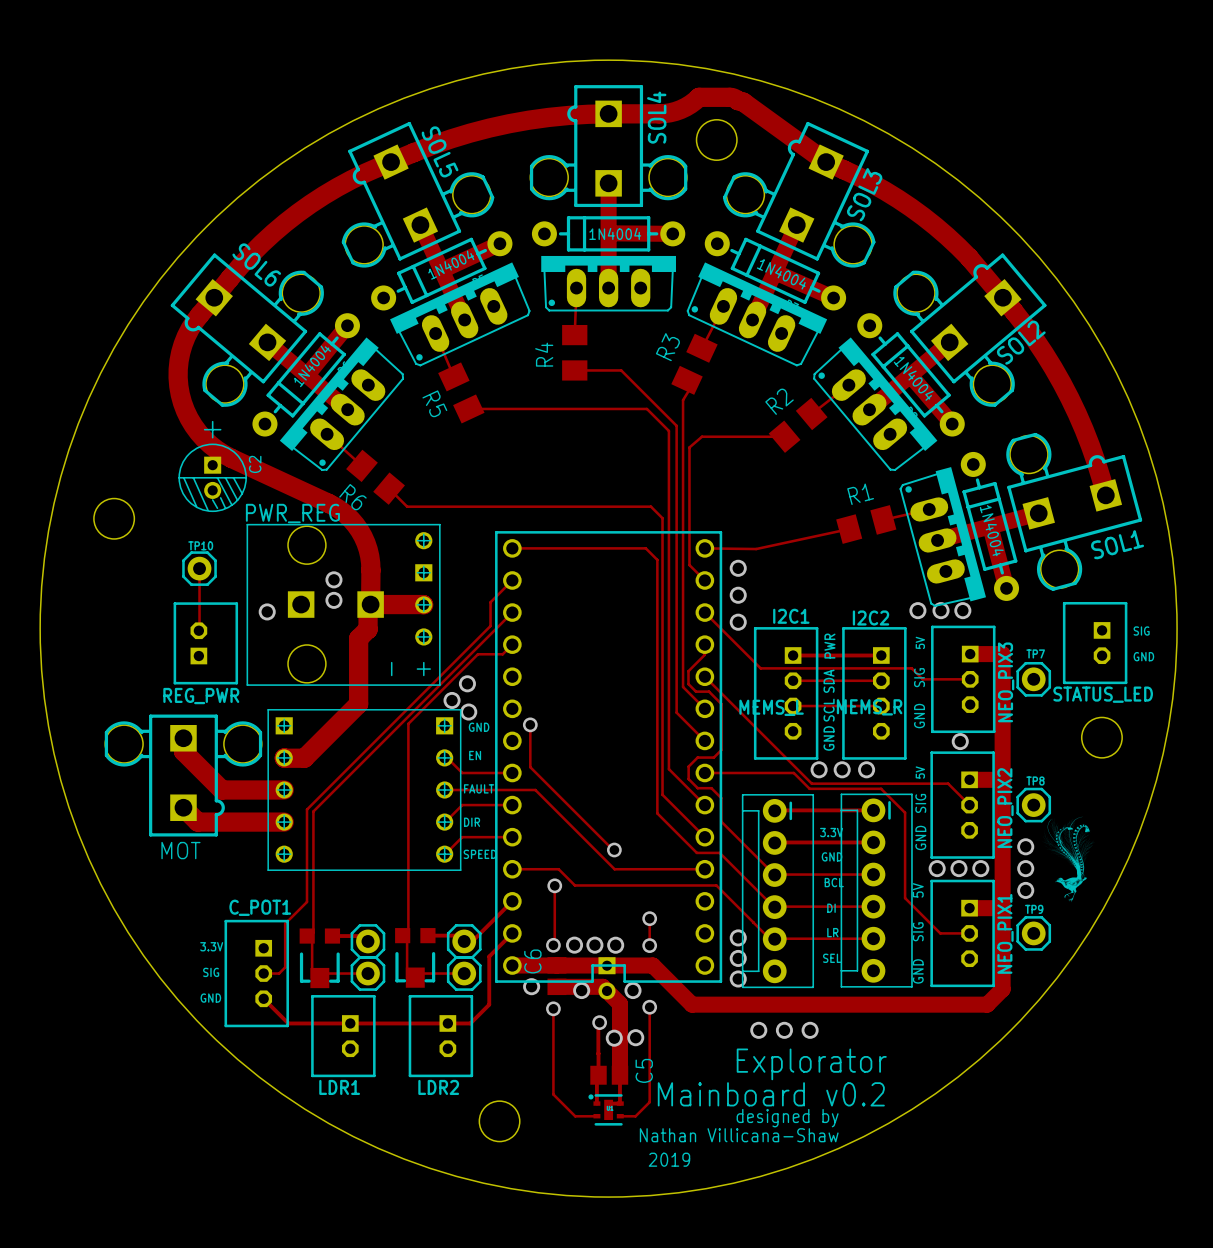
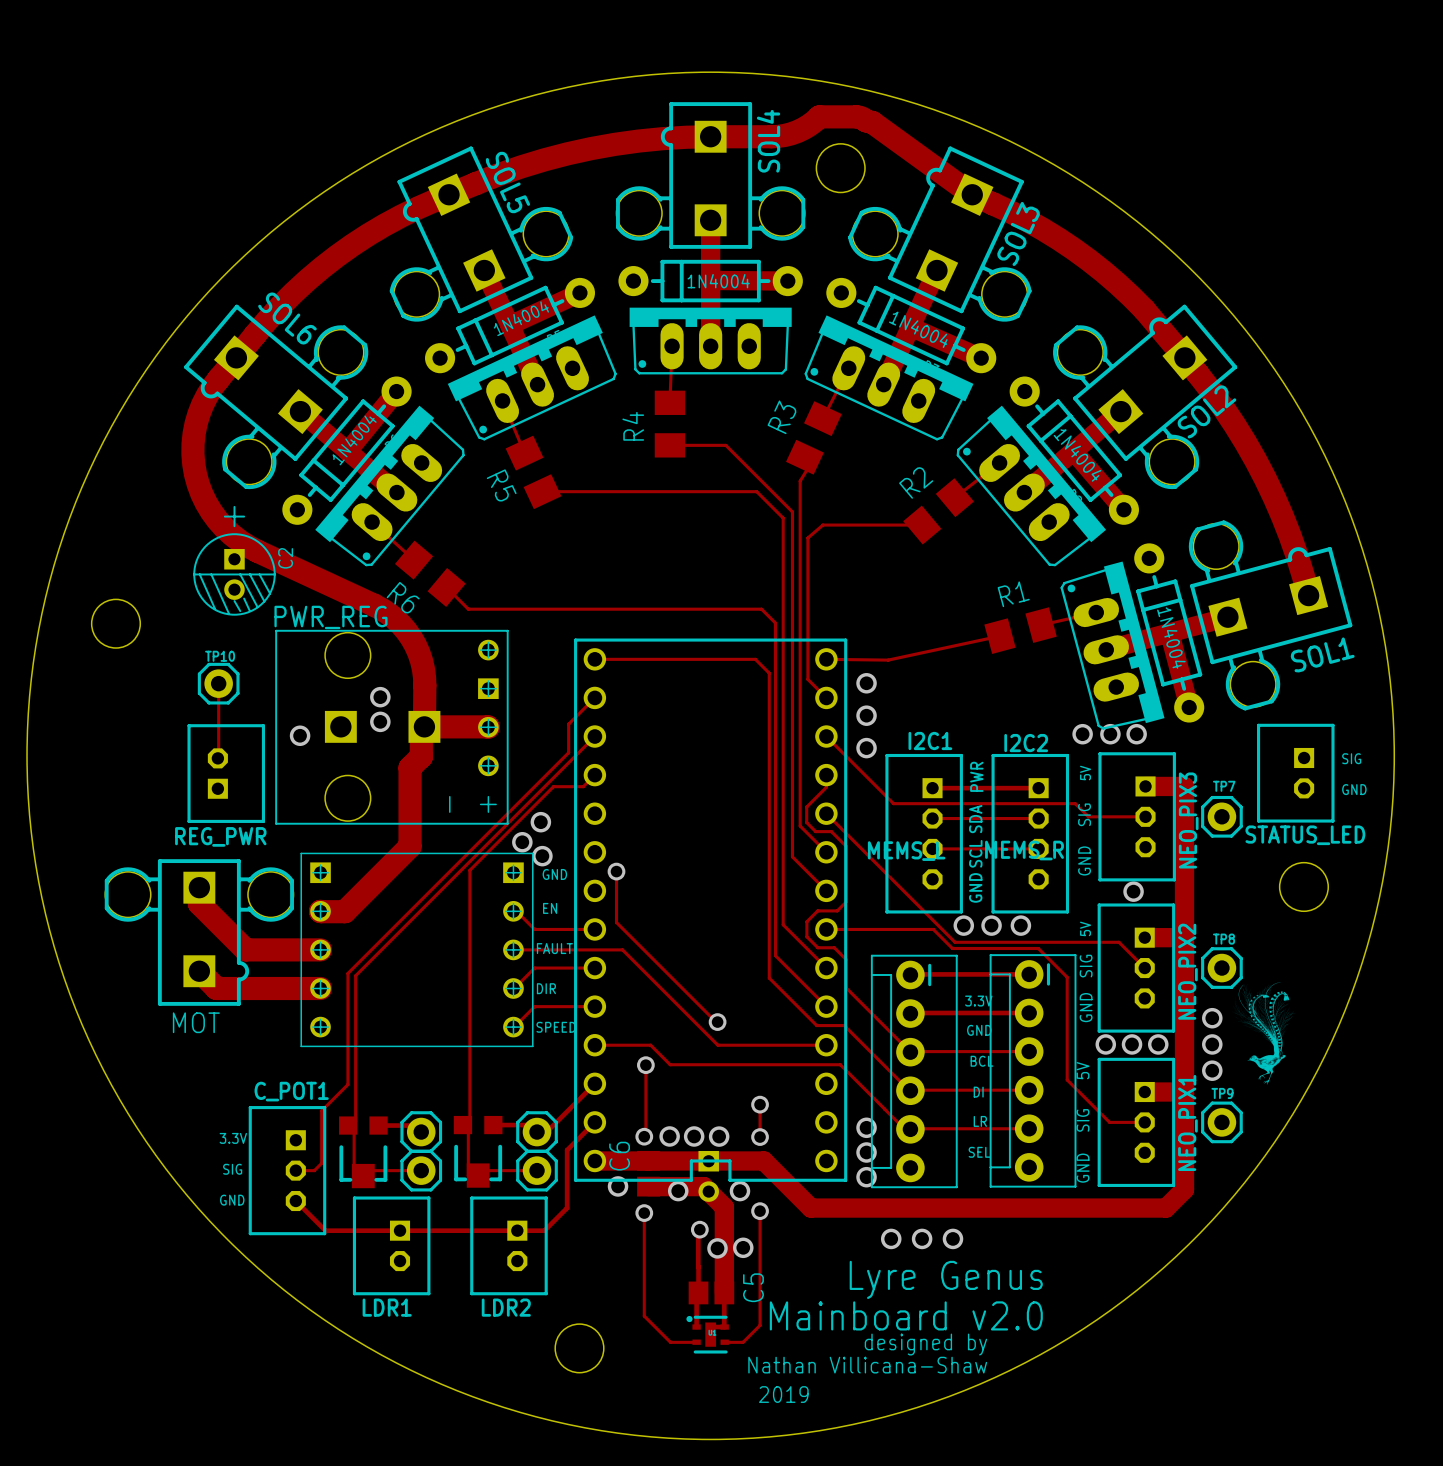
text: Explorator (811, 1064) -> Lyre Genus (946, 1279)
text: Mainboard v0.2 (771, 1094) -> Mainboard v2.0 (906, 1315)

